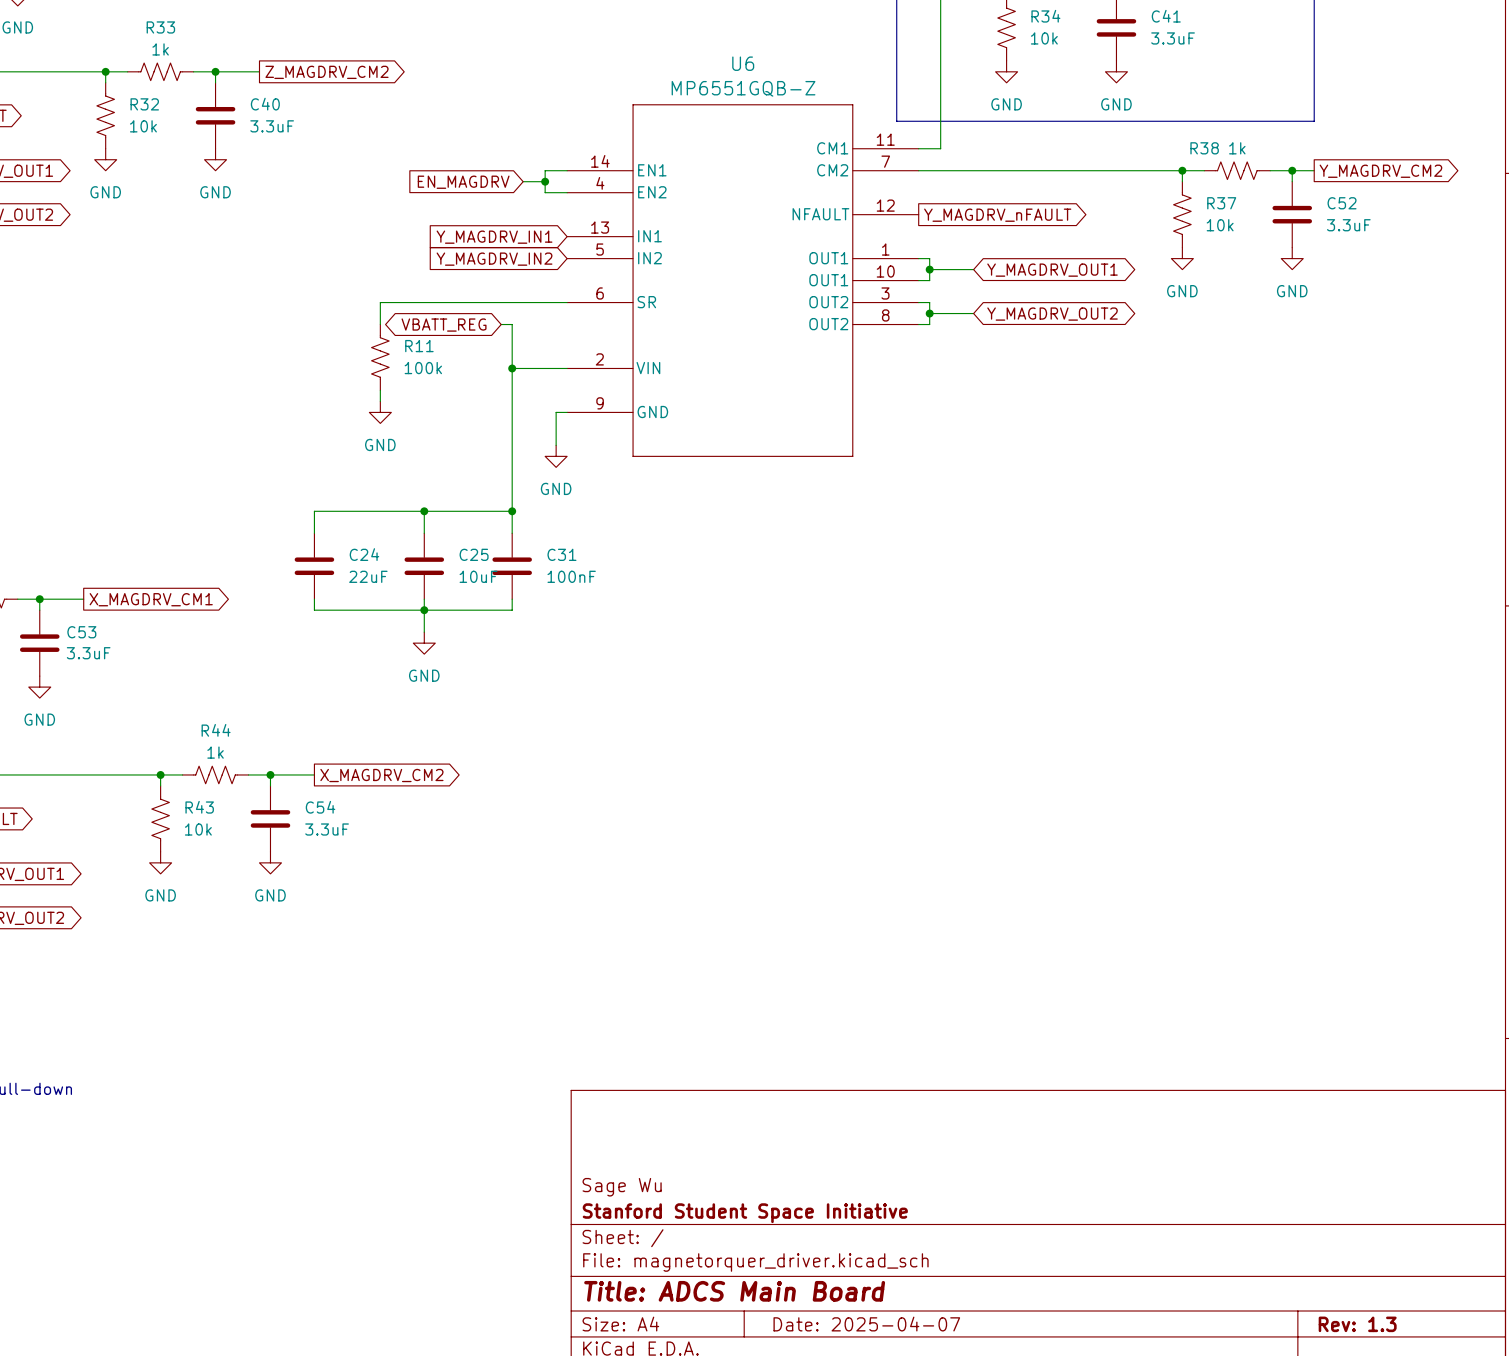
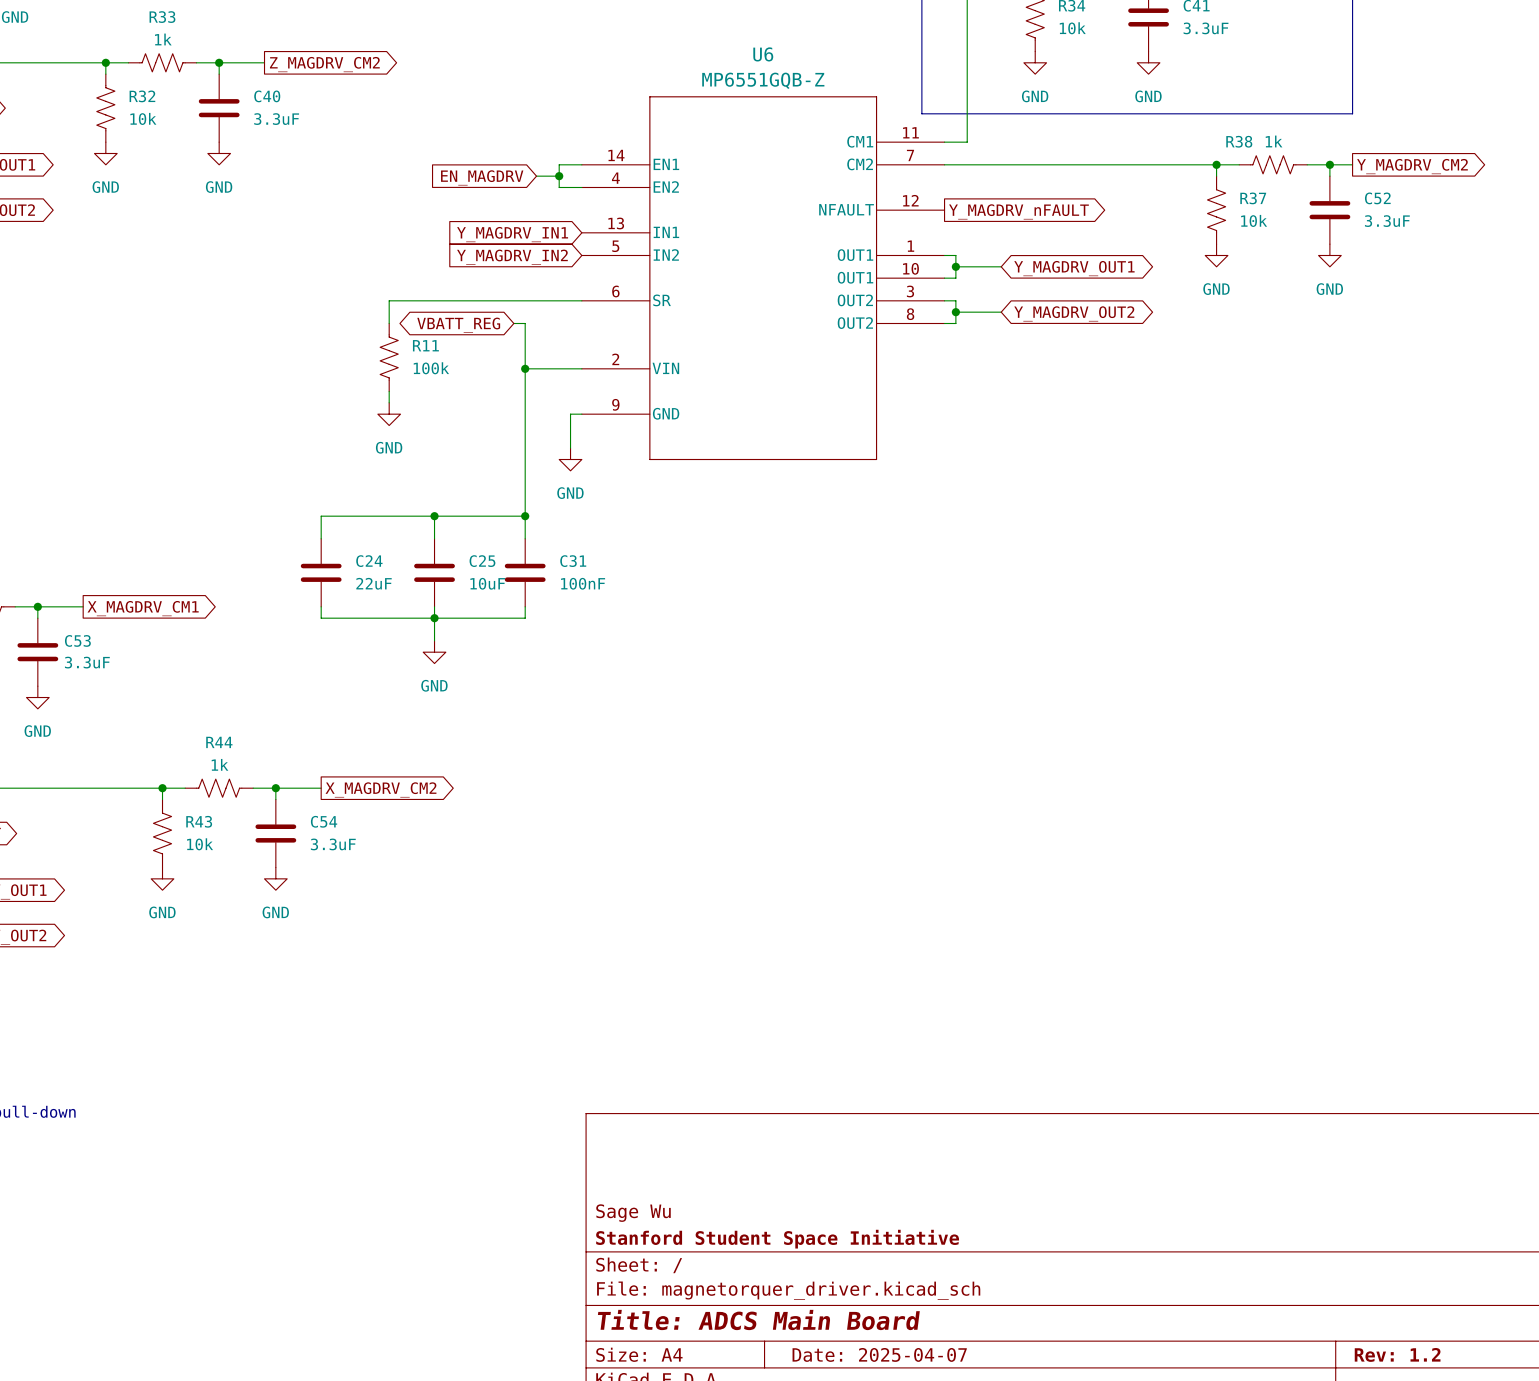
title block: Rev: 1.3 (1357, 1324) -> Rev: 1.2 (1397, 1354)

